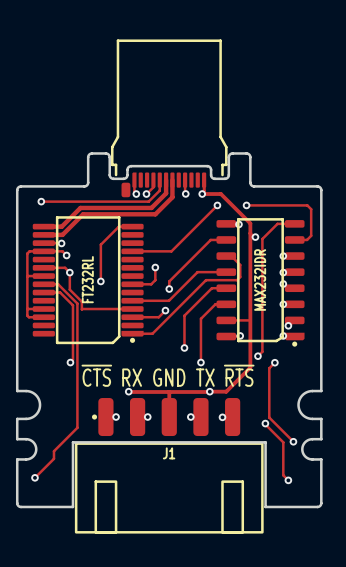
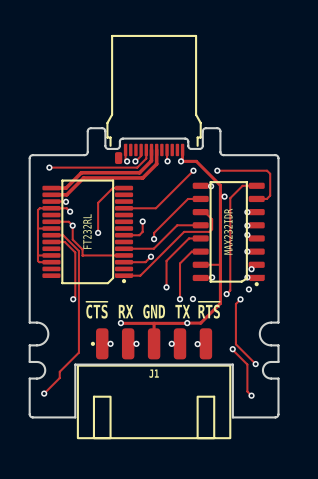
via: none -> (248, 289)
via: none -> (192, 299)

